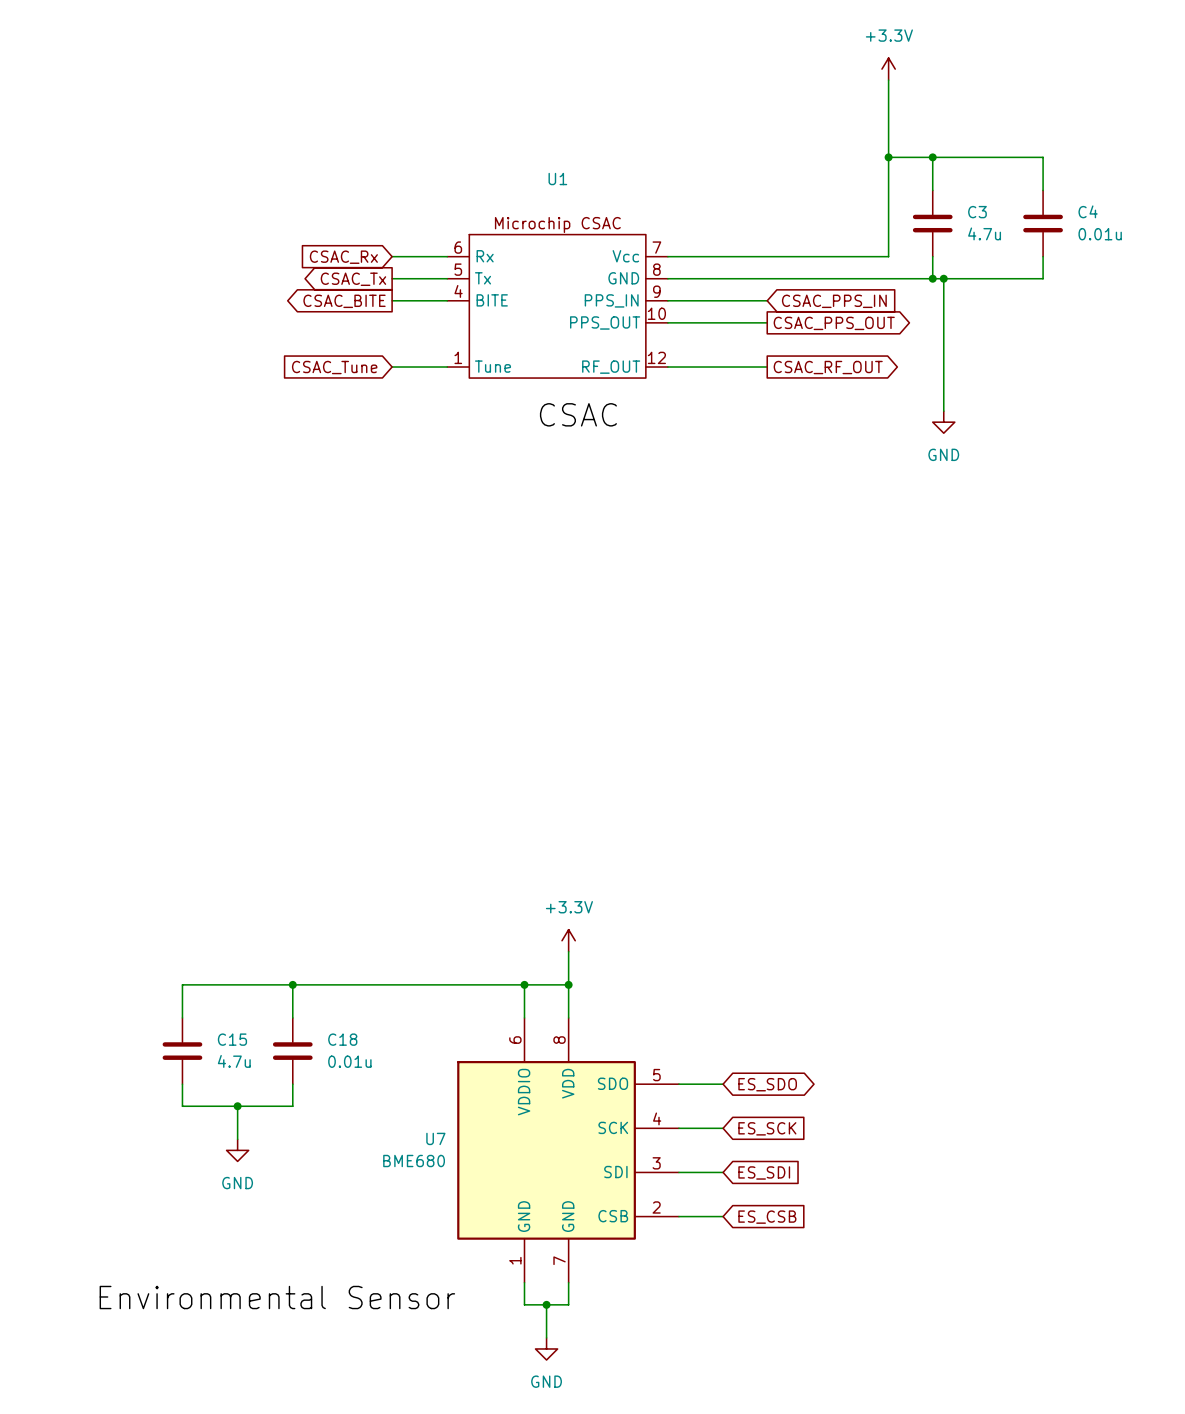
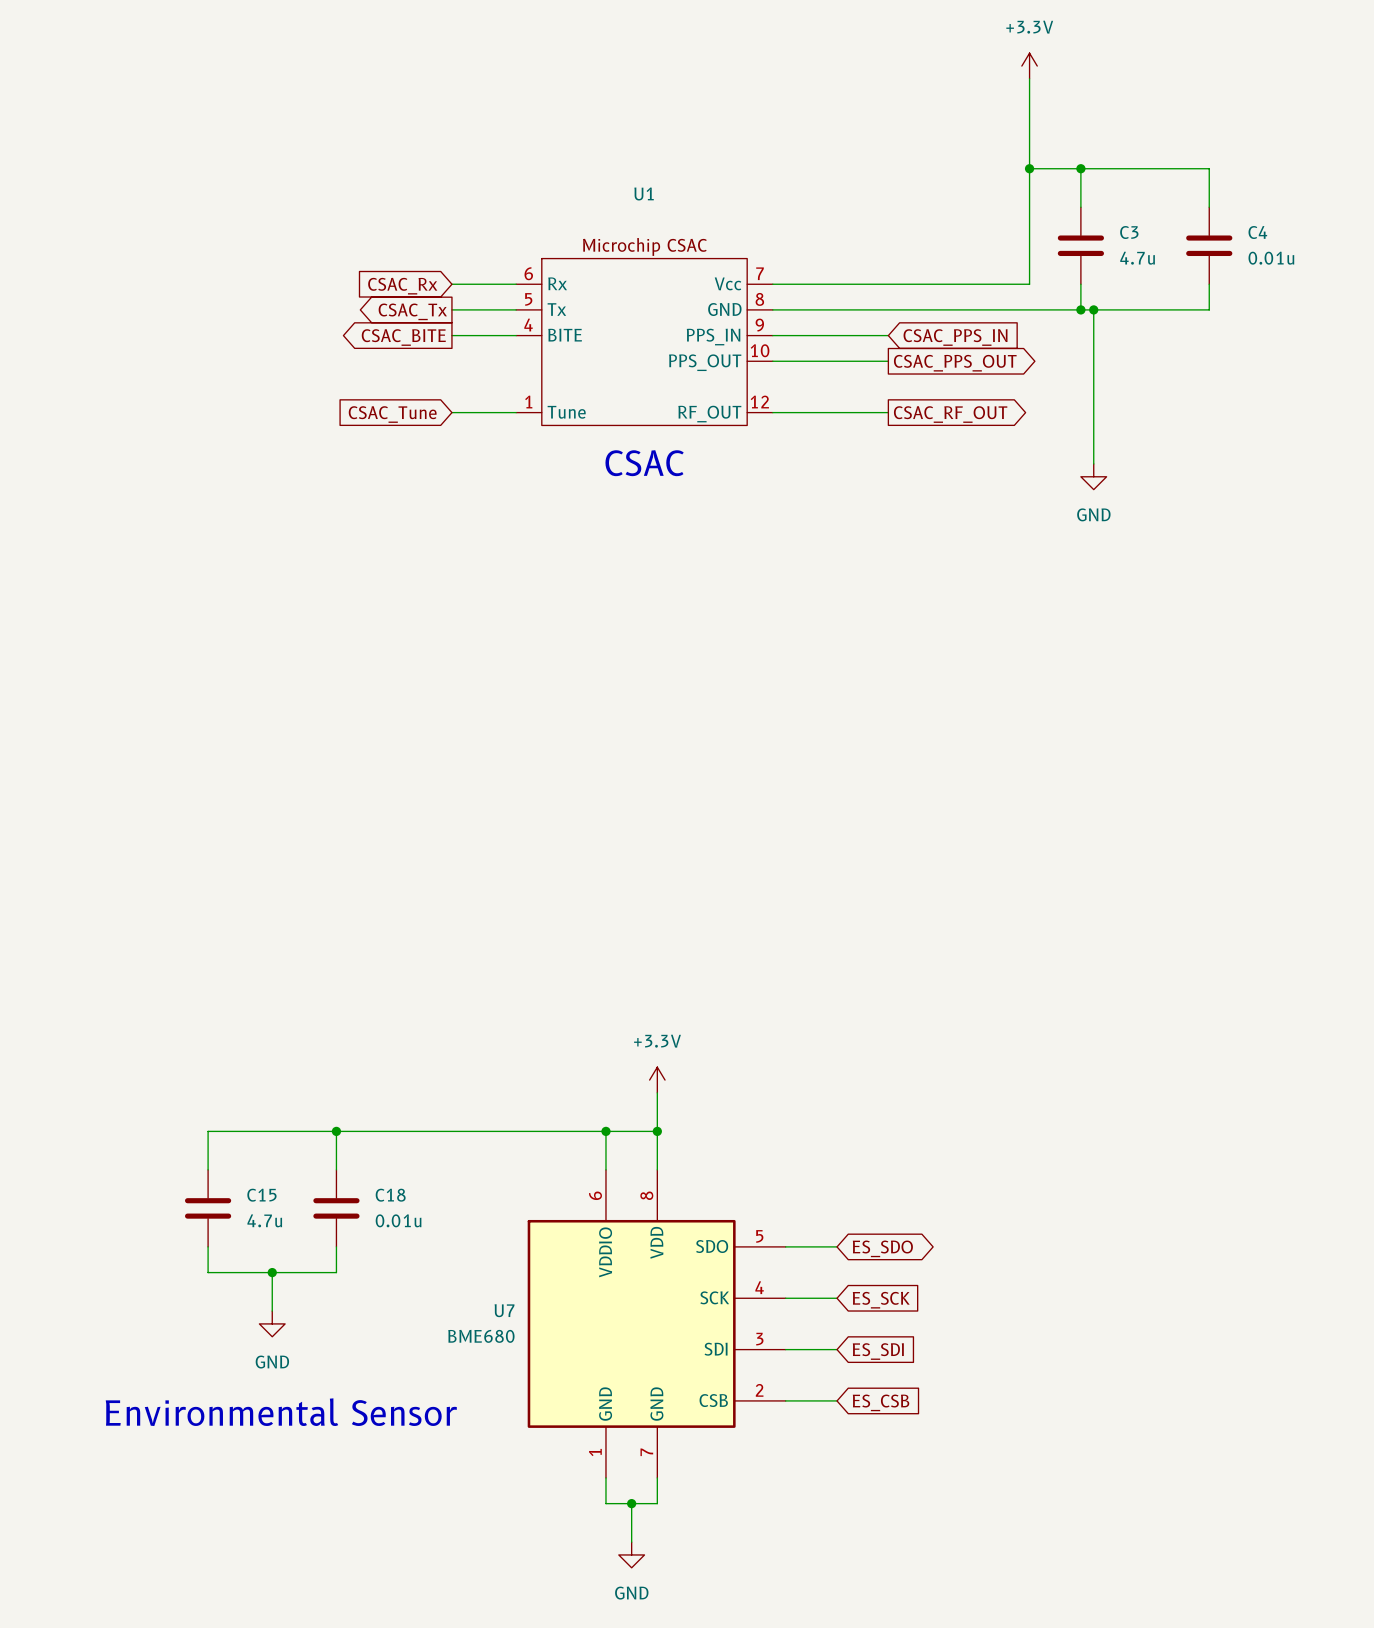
text: none -> CSAC (644, 463)
label: CSAC (578, 414) -> none
text: none -> Environmental Sensor (281, 1412)
label: Environmental Sensor (277, 1297) -> none

